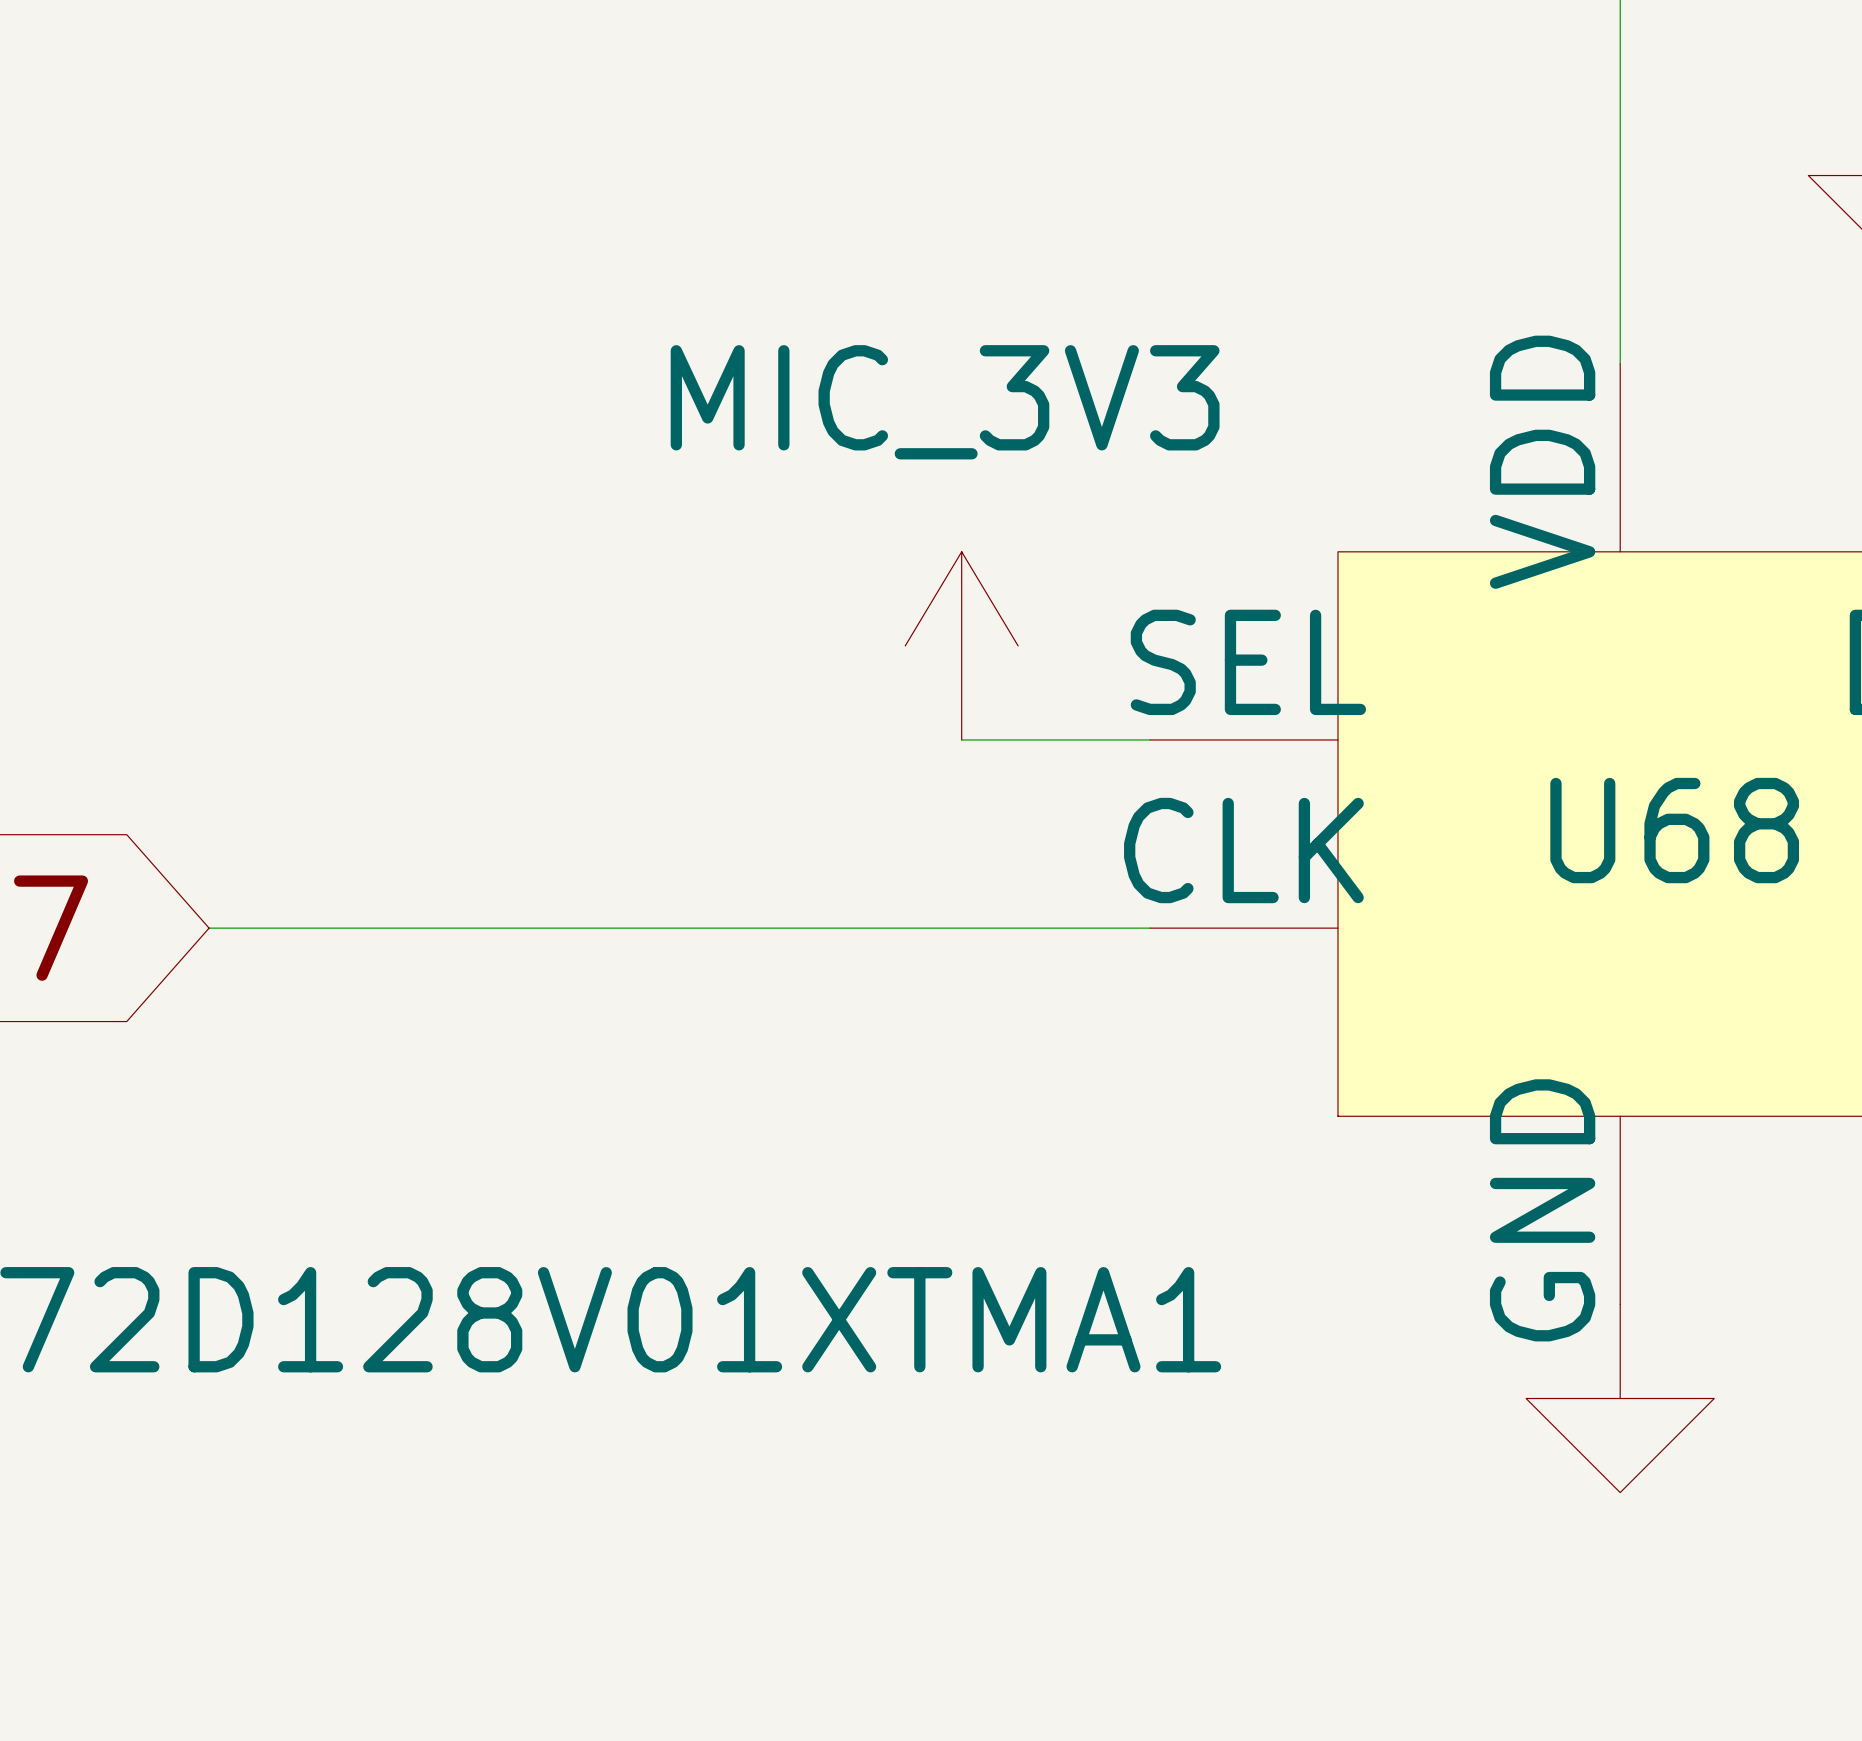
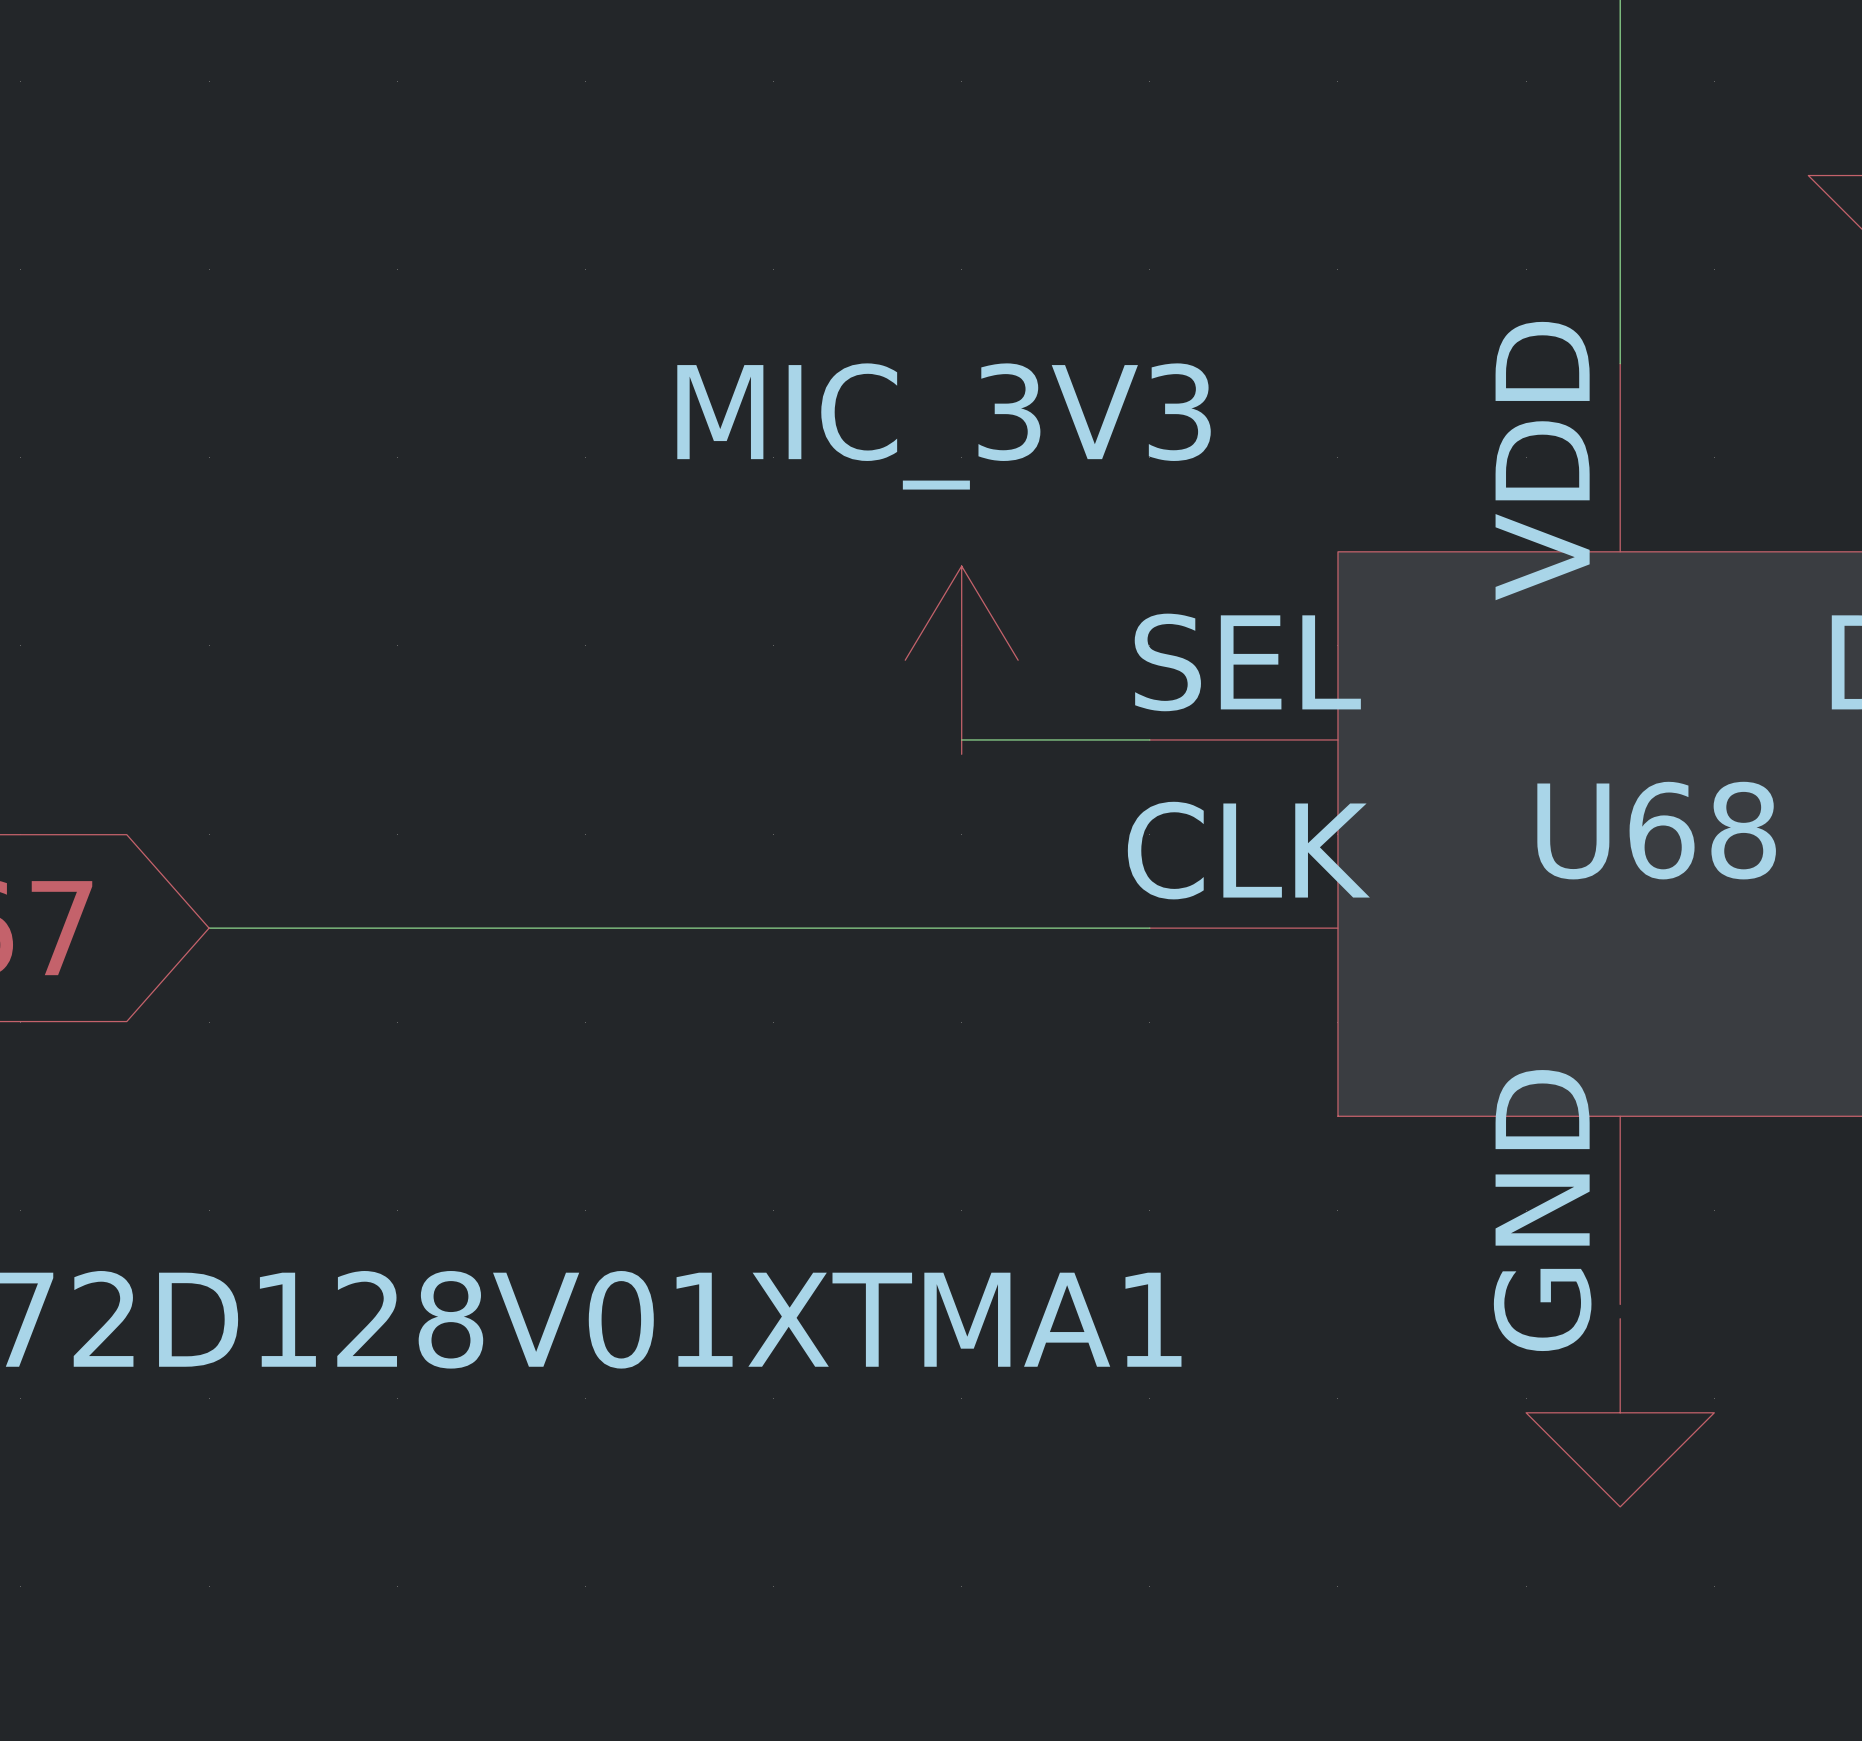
power symbol position: MIC_3V3 (961, 645) -> MIC_3V3 (961, 660)
power symbol position: (1620, 1398) -> (1620, 1412)

